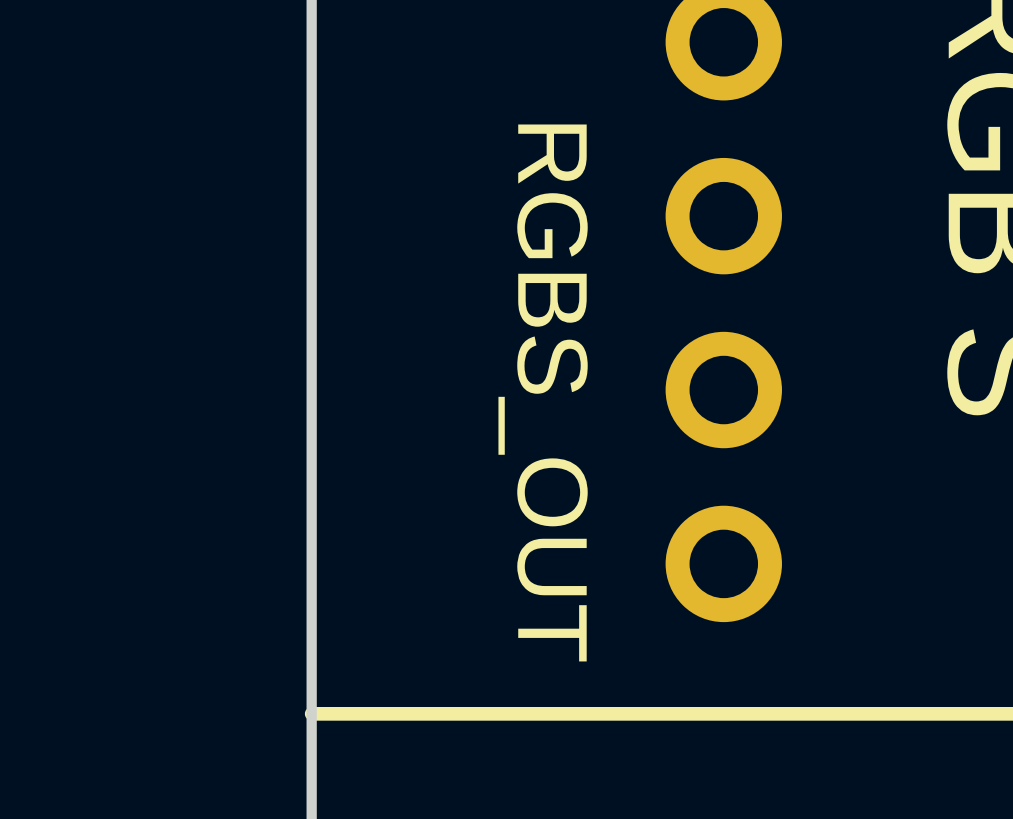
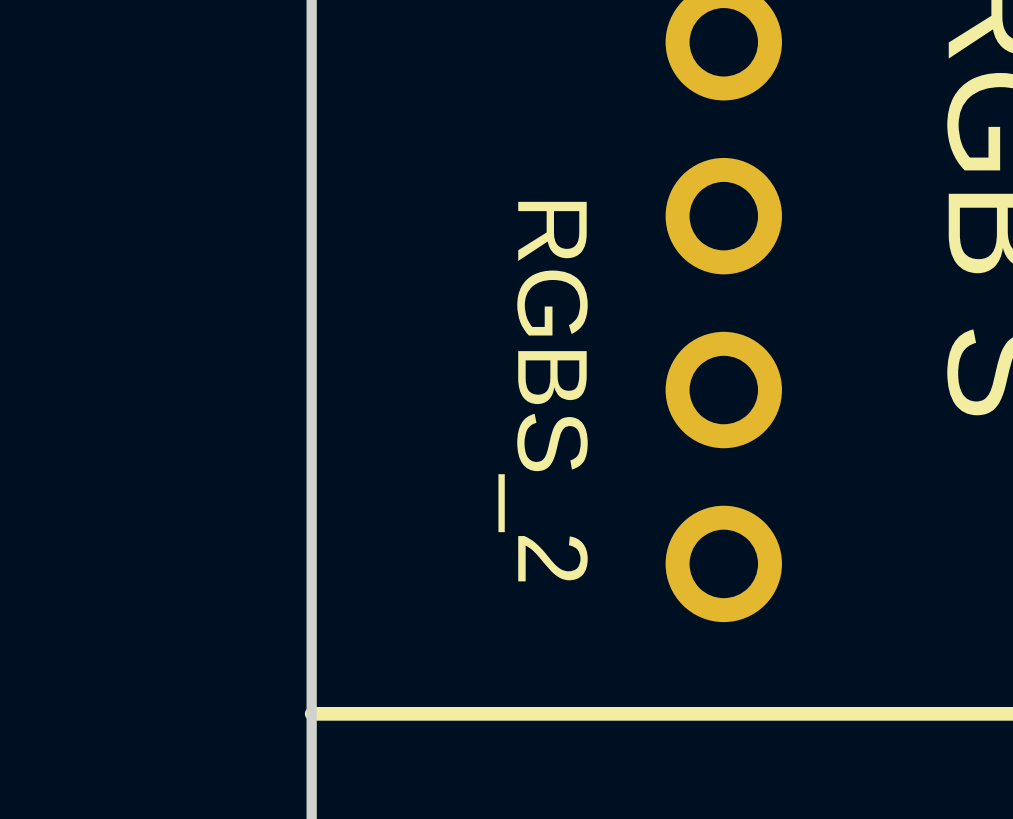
part value: RGBS_OUT (543, 392) -> RGBS_2 (543, 391)

